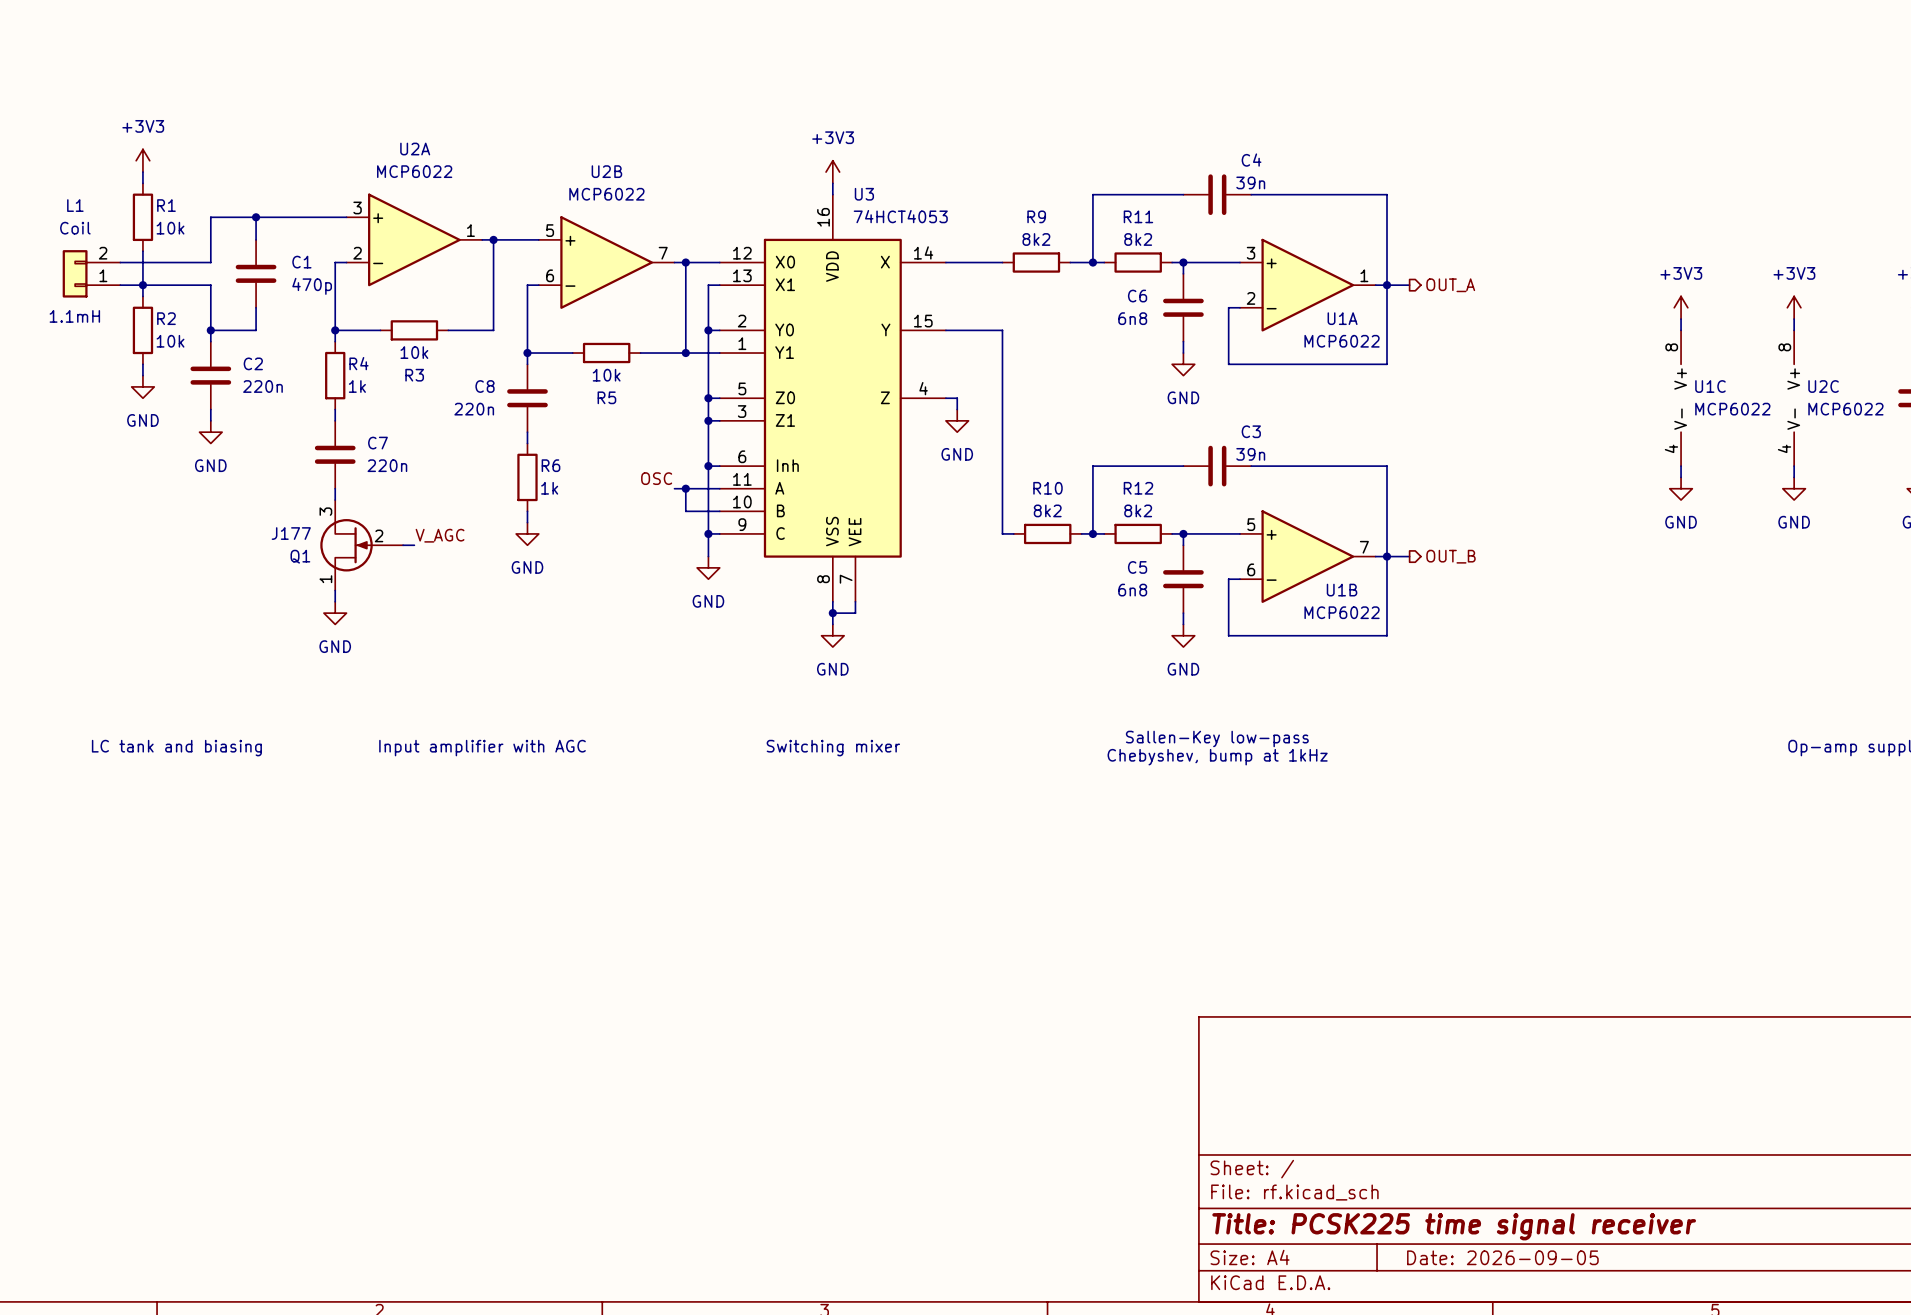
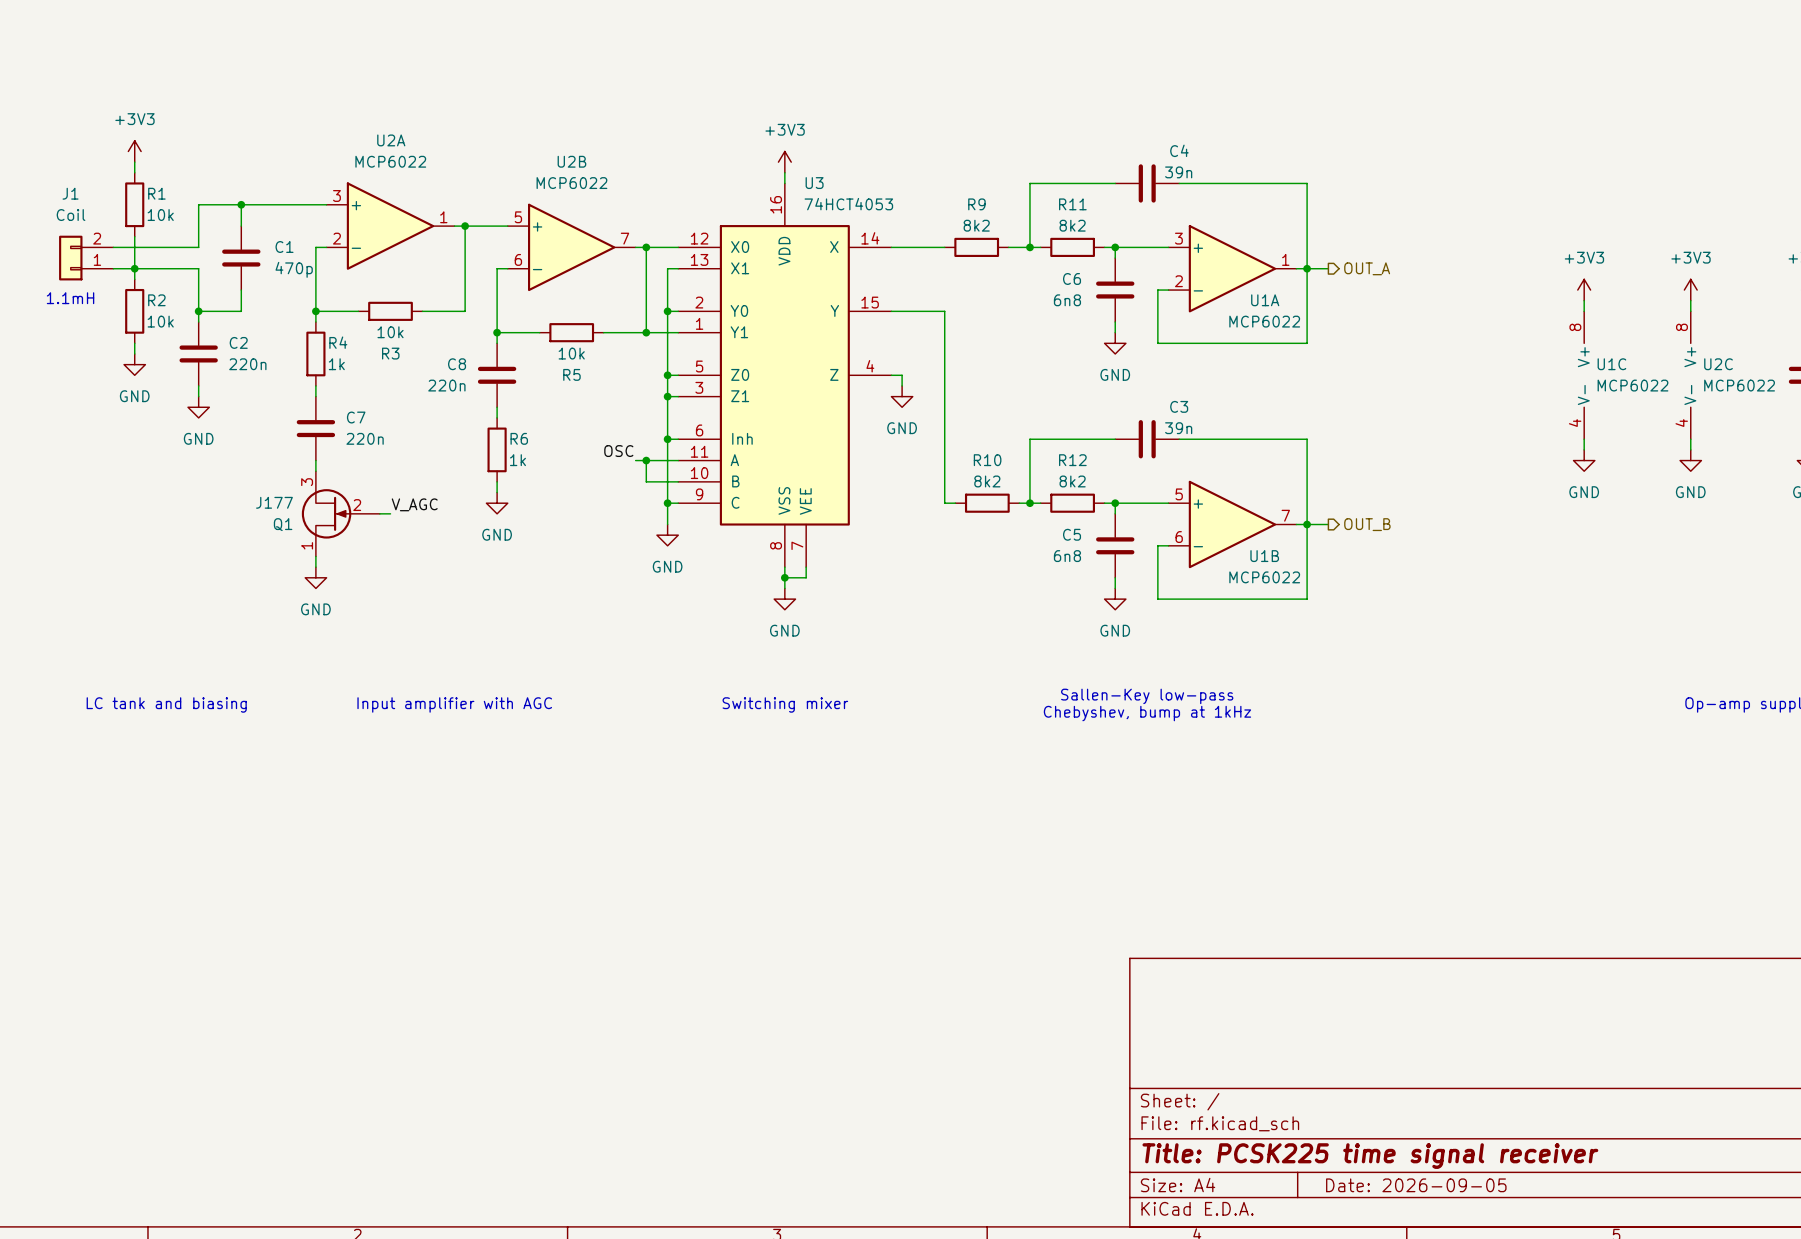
L1 name: L1 (75, 205) -> J1 (70, 193)

